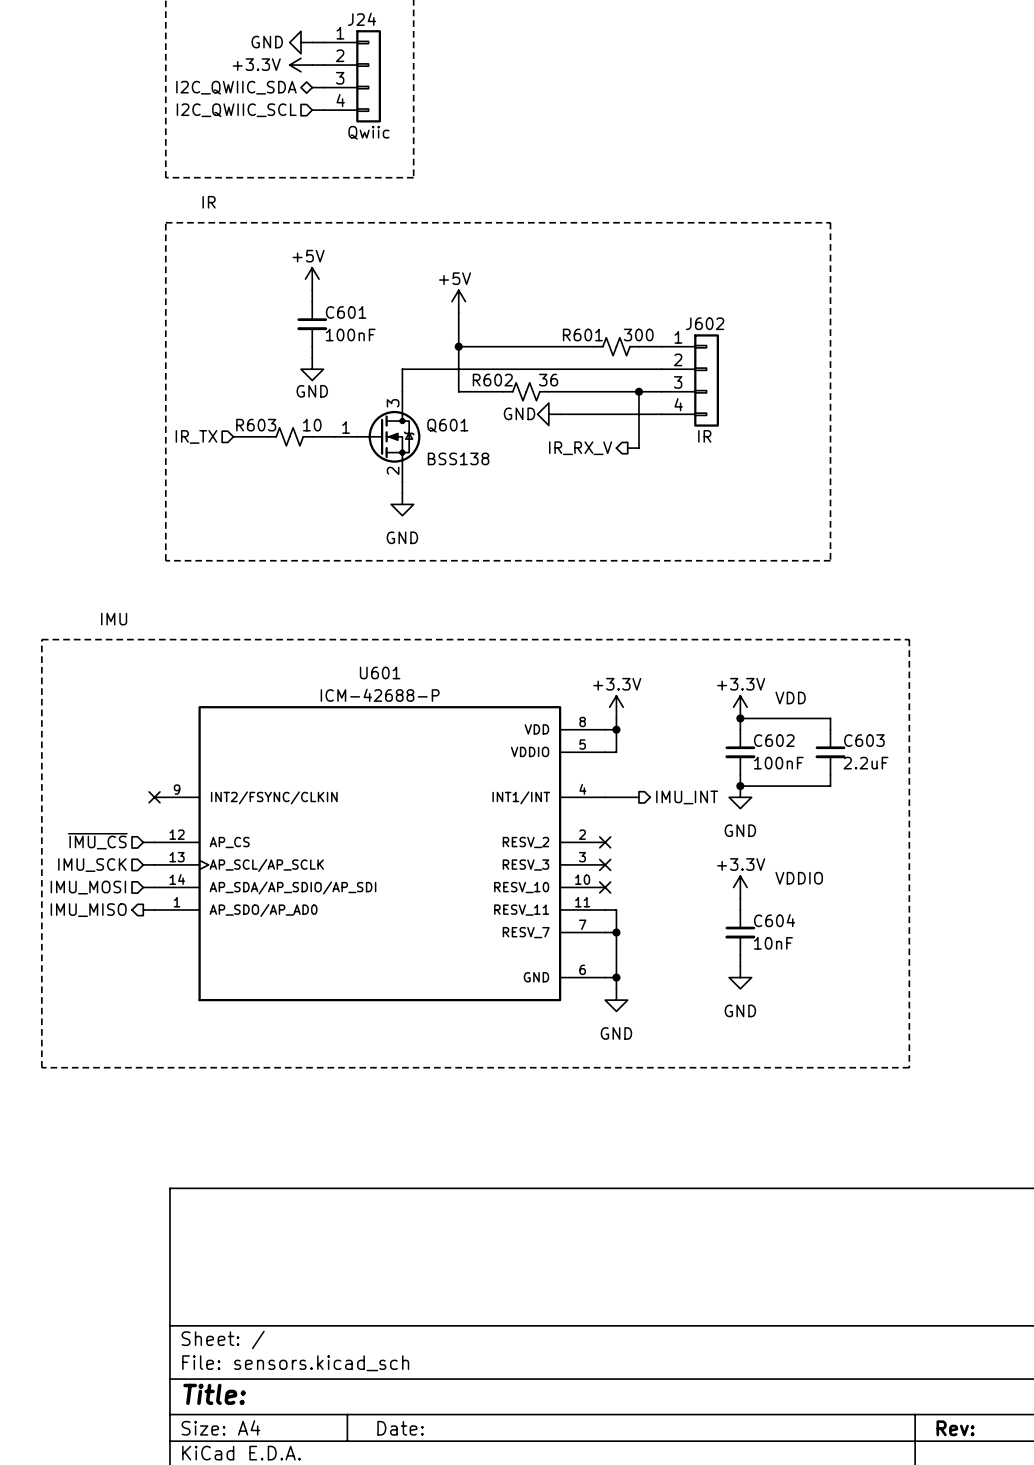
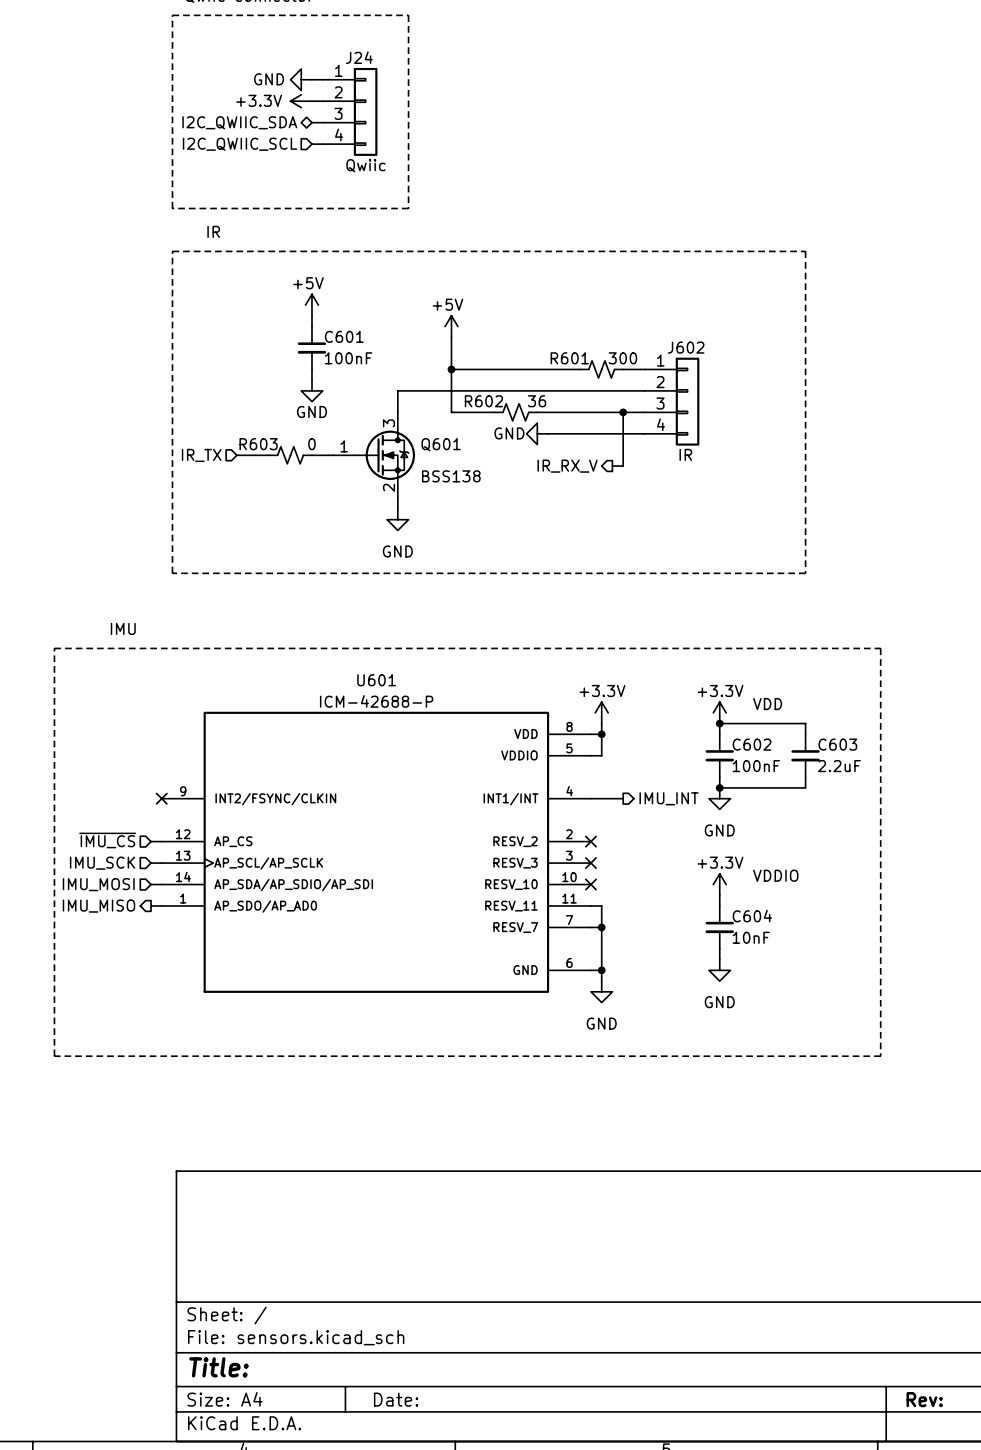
R603 value: 10 (312, 425) -> 0 (311, 444)

